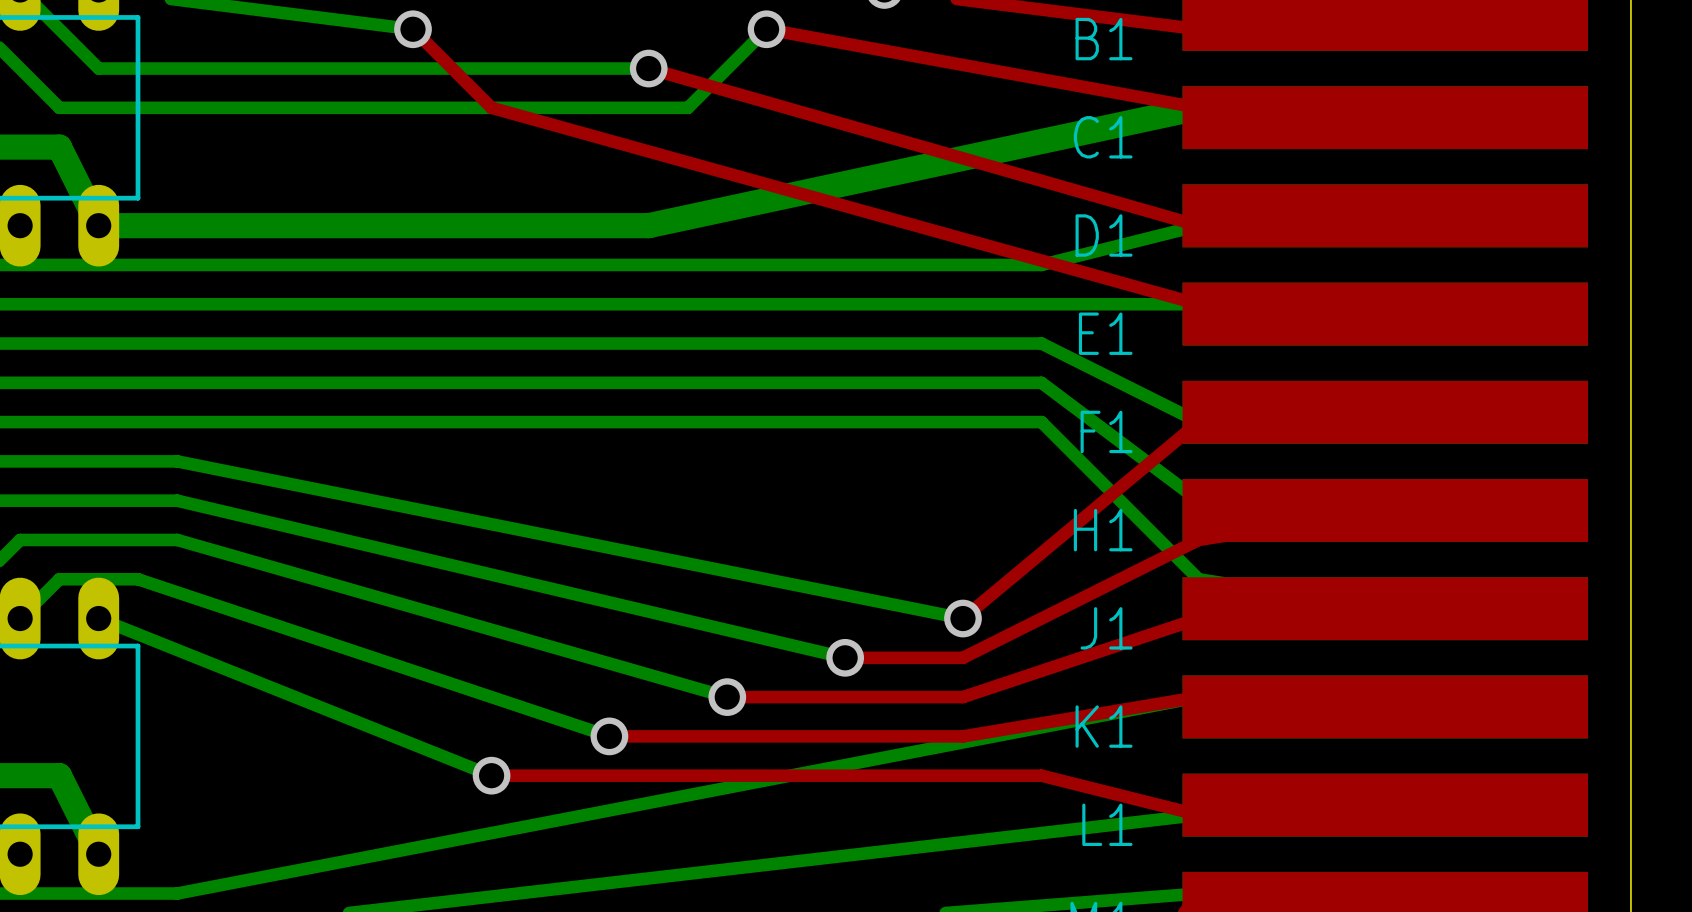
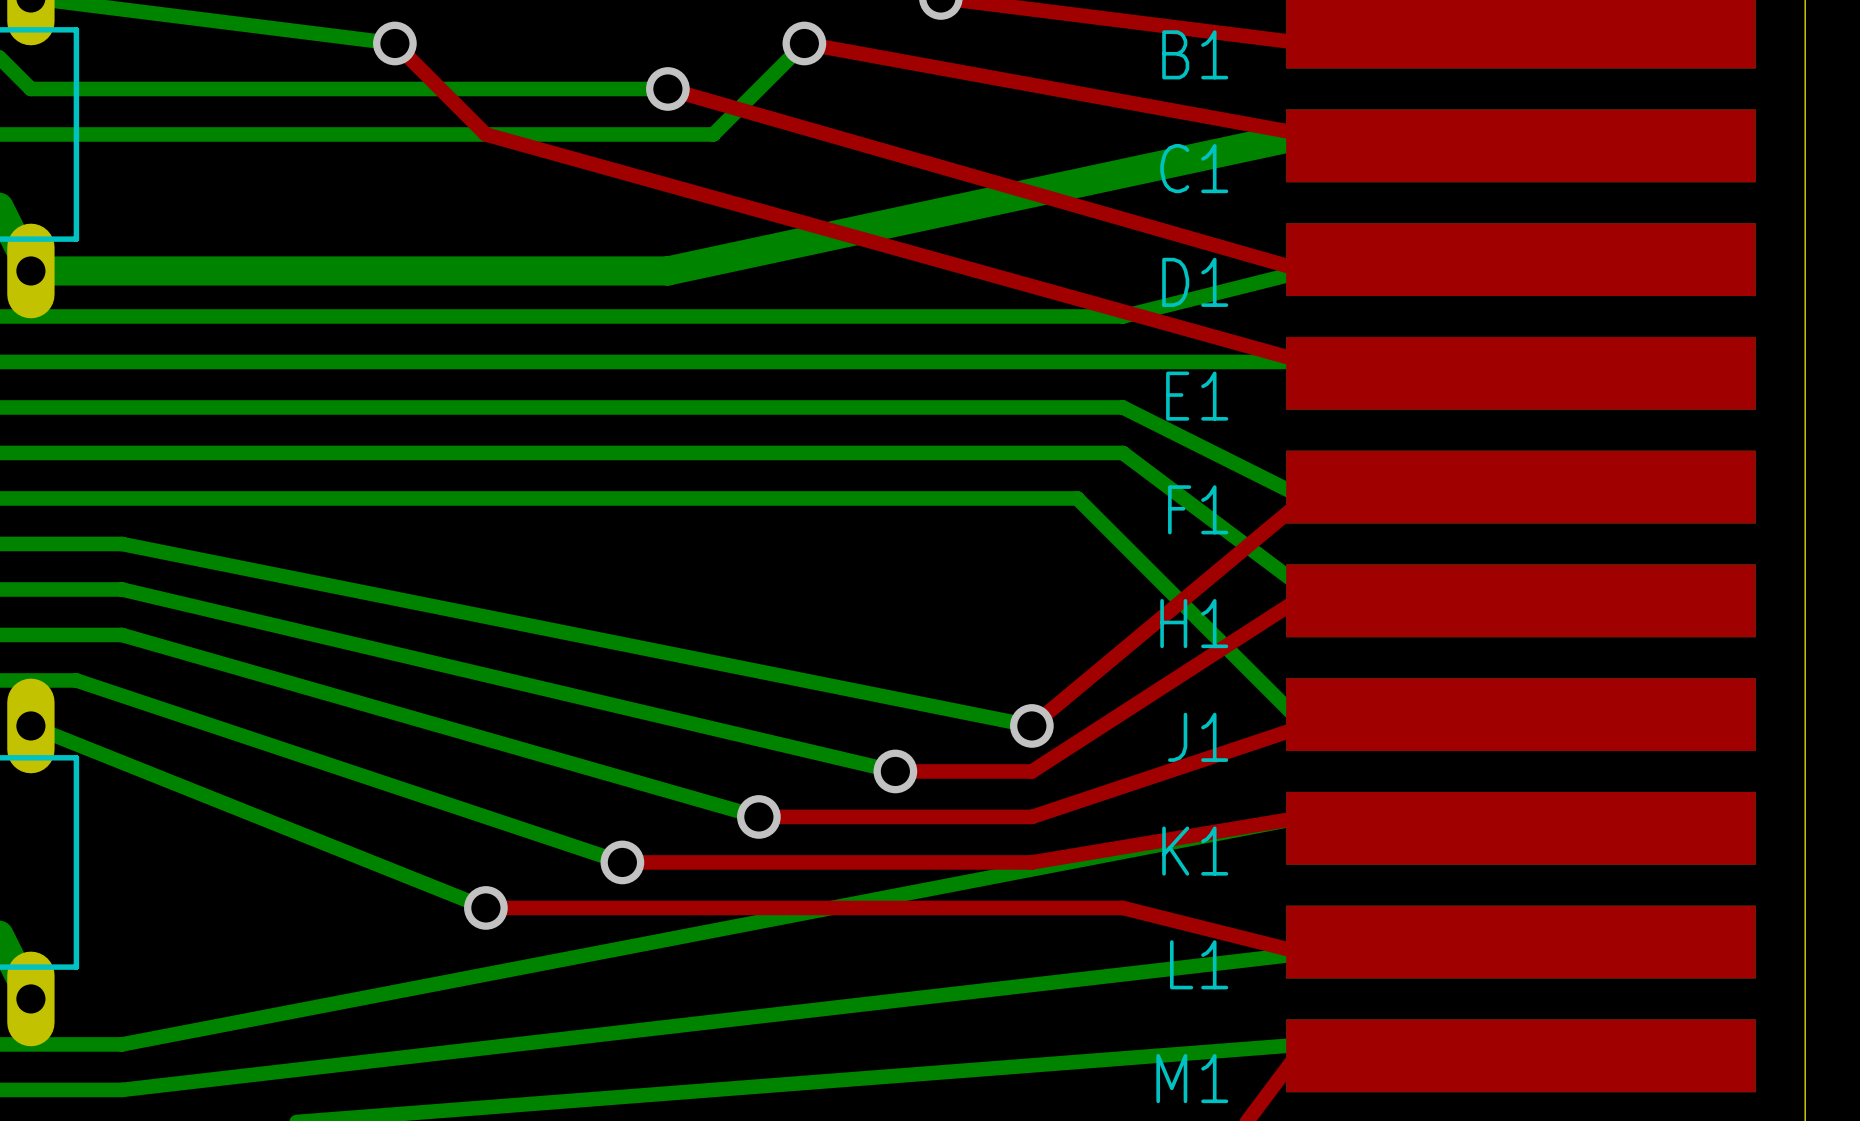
bottom track: (1002, 422) (1041, 422) (1198, 579) (1385, 608) -> (1077, 498) (1304, 725) (1520, 714)
top track: (1385, 510) (1198, 539) (962, 657) -> (1520, 600) (1313, 589) (1031, 771)

